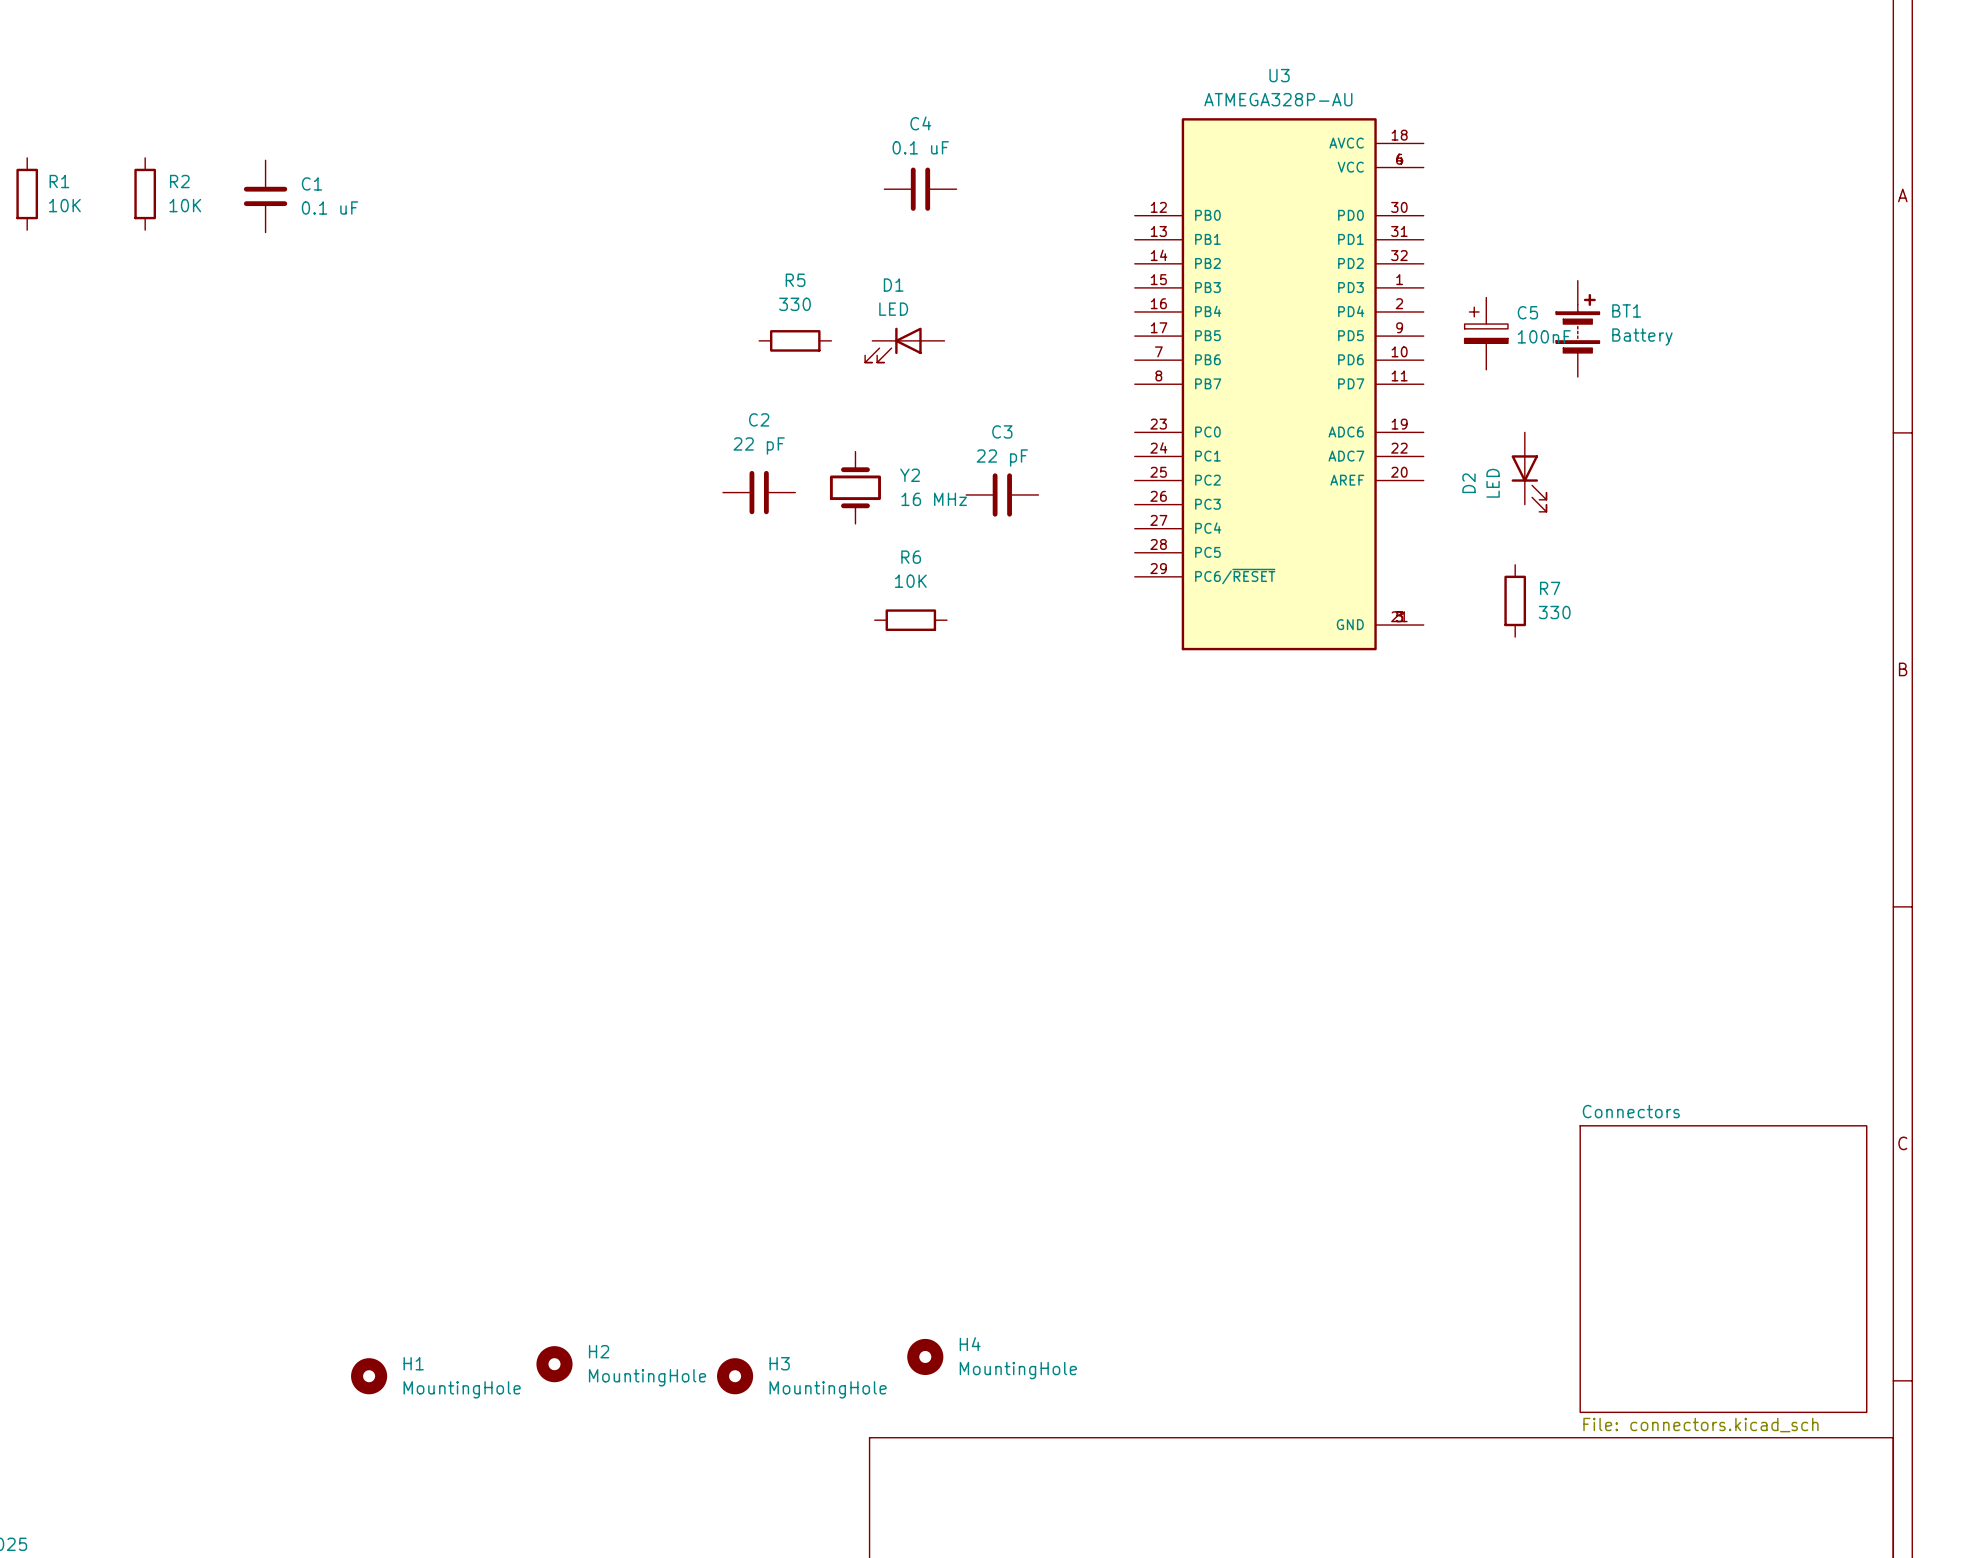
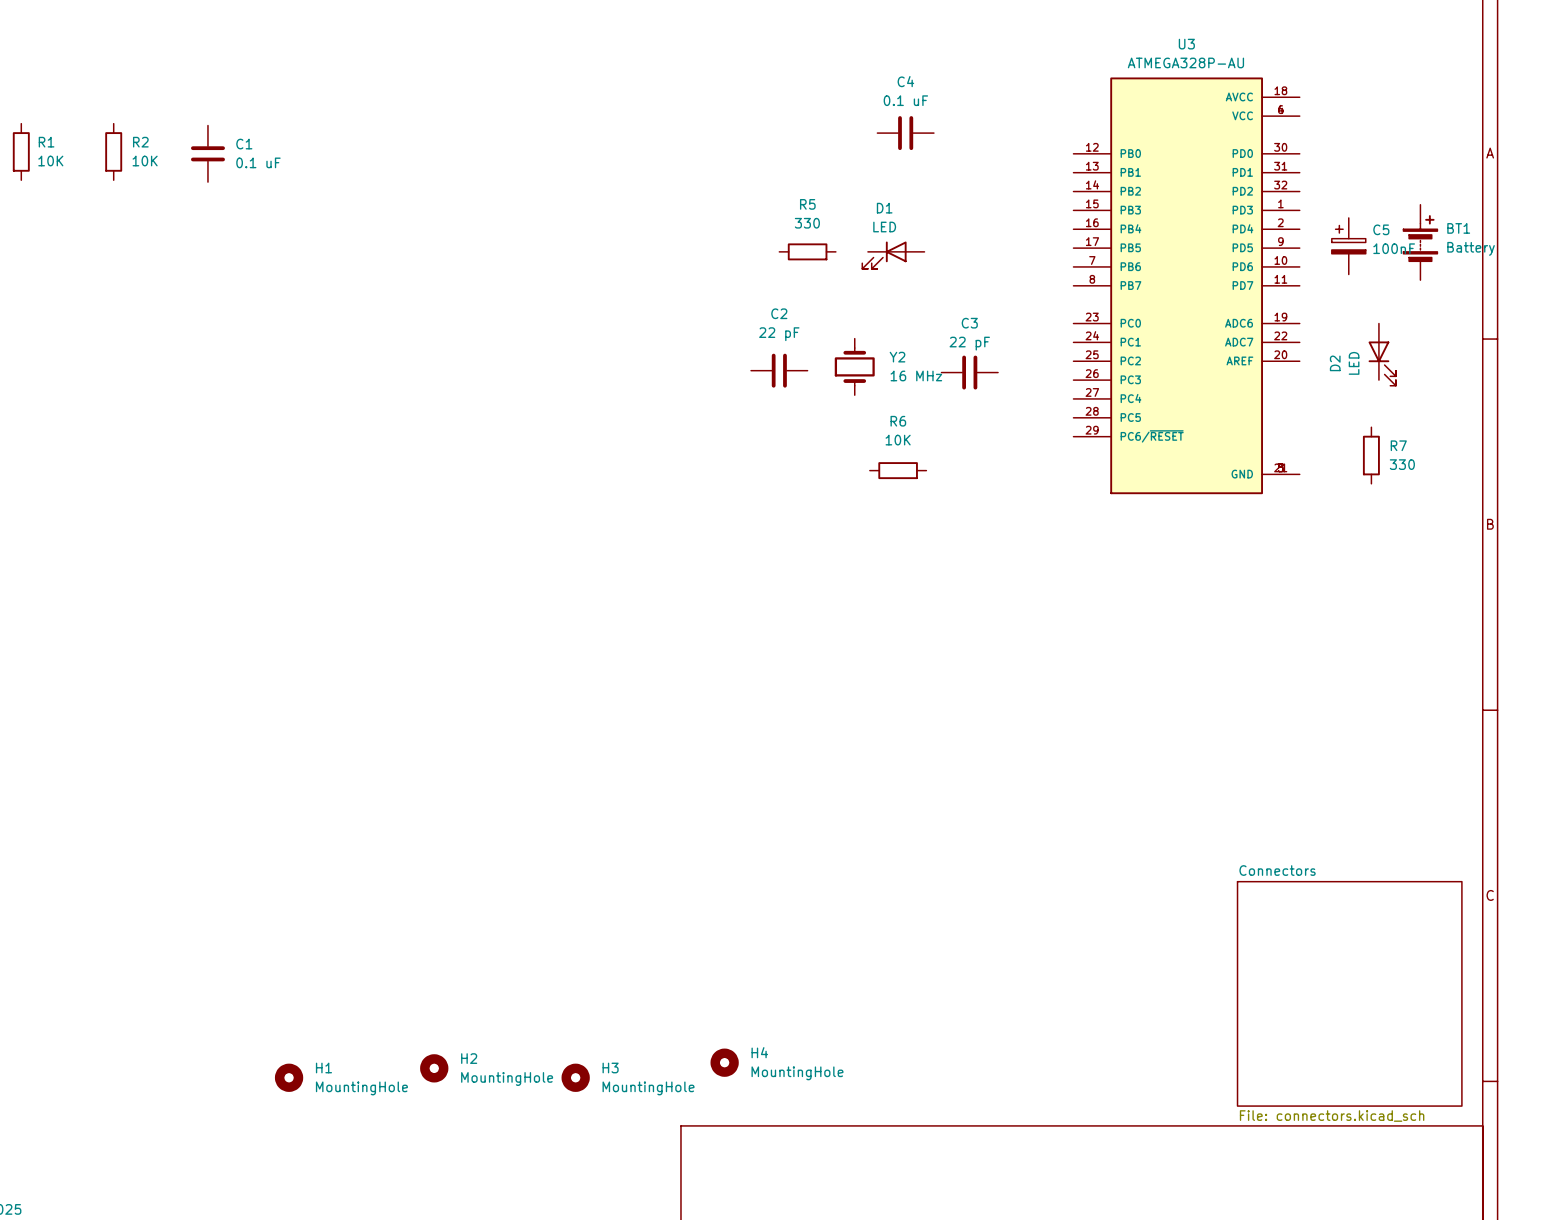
C4 position: (920, 189) -> (905, 133)
BT1 position: (1577, 328) -> (1420, 242)
C5 position: (1486, 333) -> (1348, 246)
R5 position: (795, 340) -> (807, 251)
D1 position: (904, 345) -> (893, 255)
U3 position: (1279, 384) -> (1186, 285)
D2 position: (1529, 472) -> (1382, 354)
Y2 position: (855, 487) -> (854, 366)
C2 position: (759, 492) -> (779, 370)
C3 position: (1002, 494) -> (969, 372)
R7 position: (1515, 600) -> (1371, 455)
R6 position: (910, 620) -> (898, 470)

